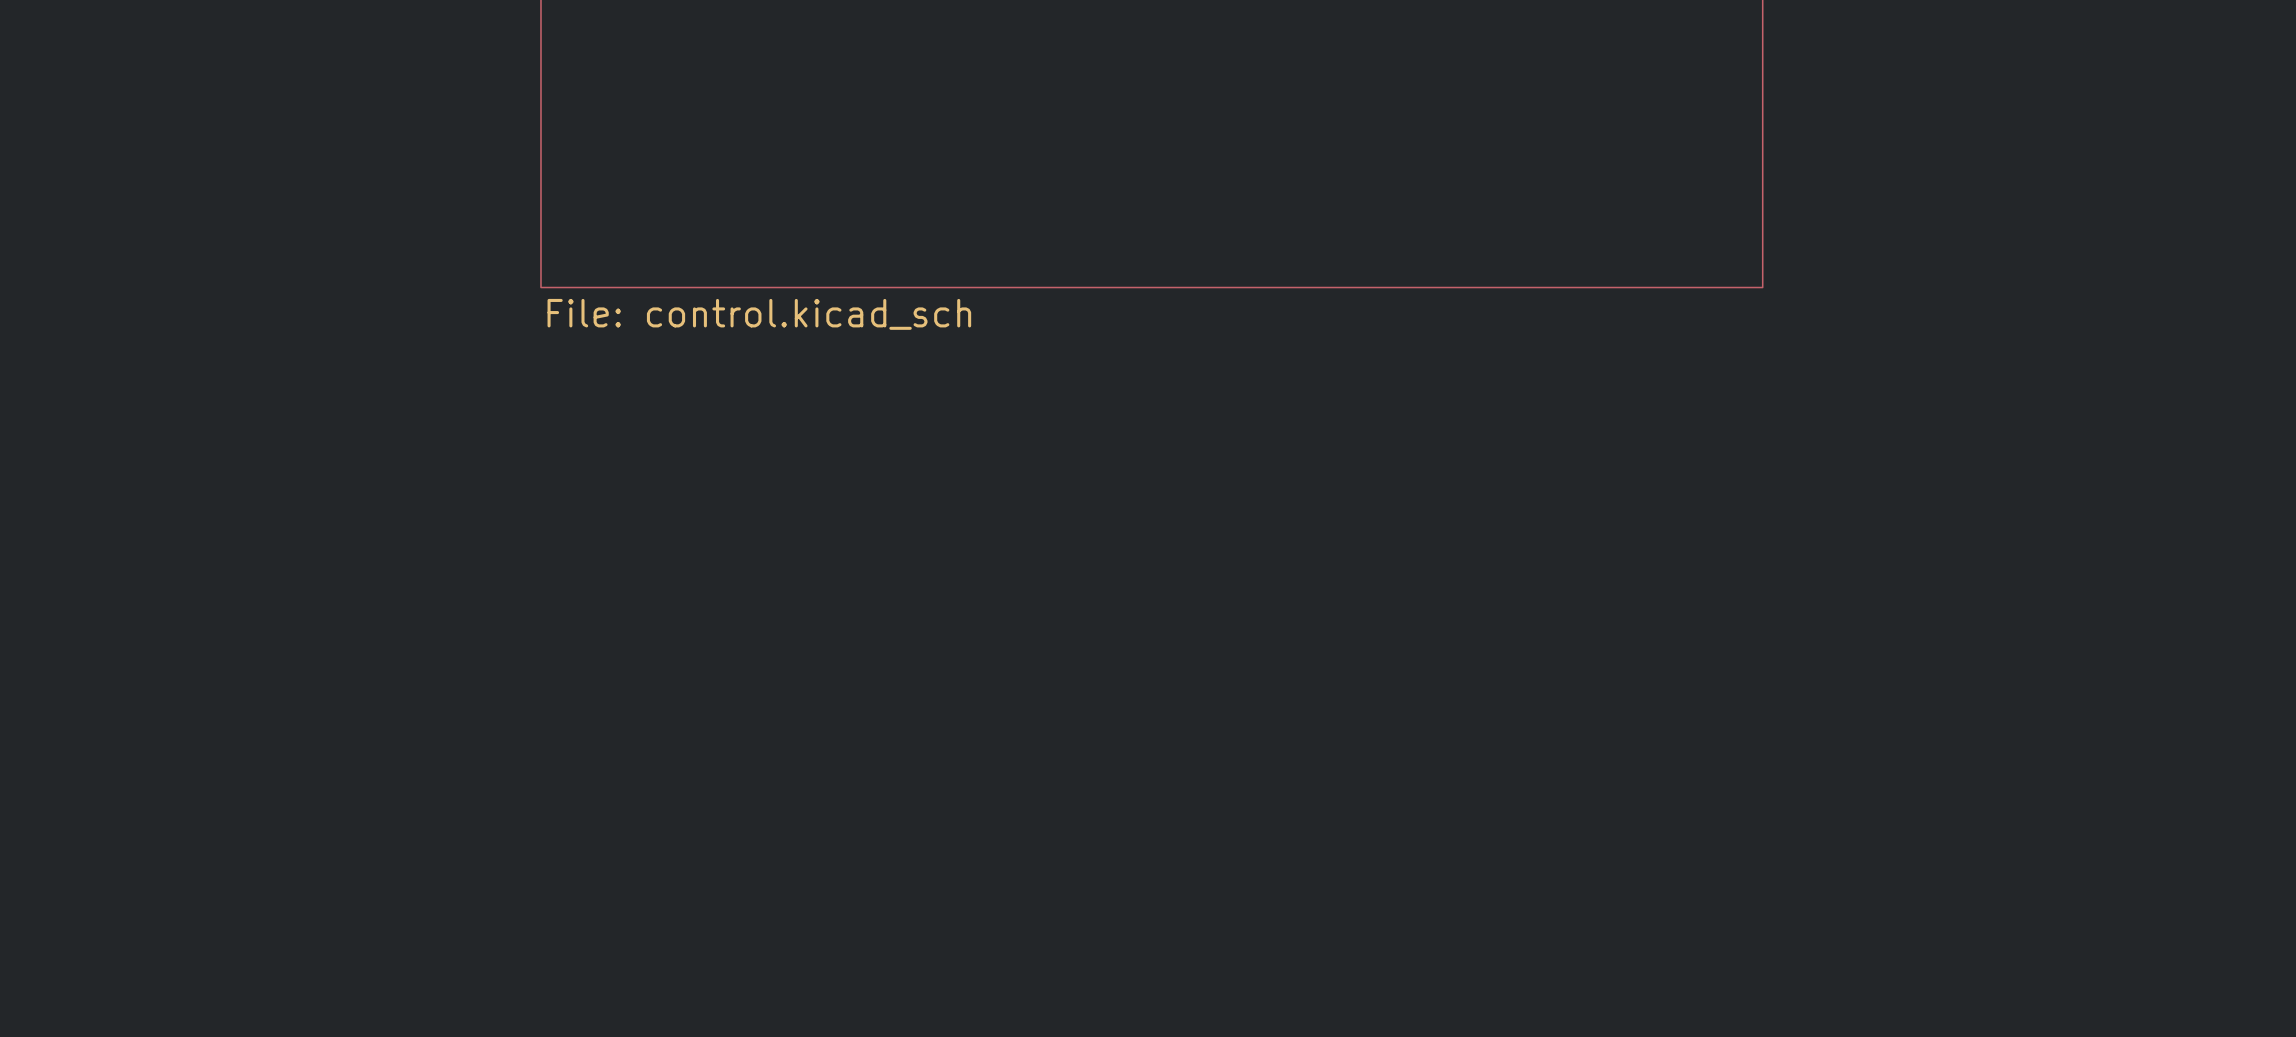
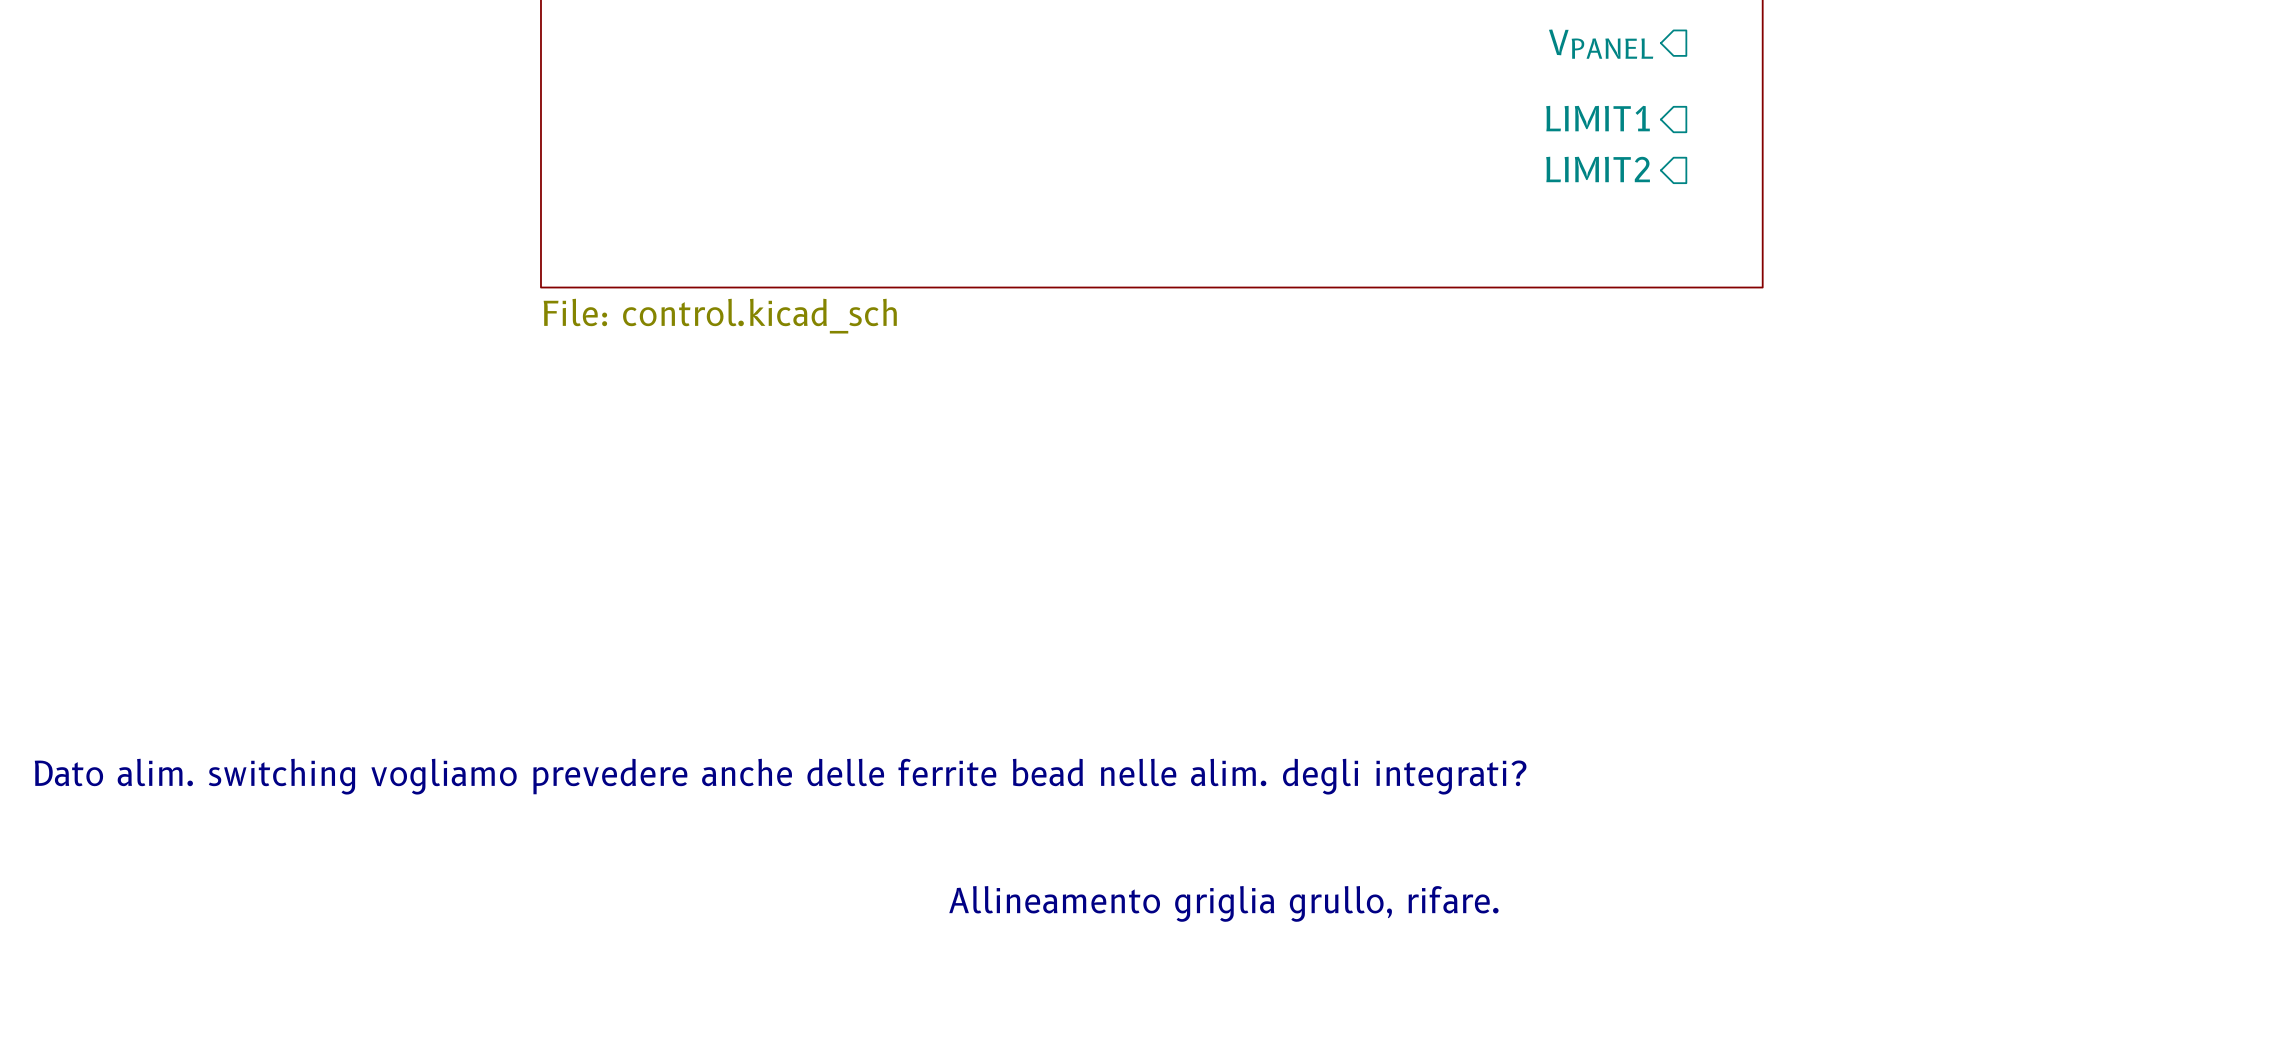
sheet pin: none -> VPANEL (1601, 44)
sheet pin: none -> LIMIT1 (1598, 118)
sheet pin: none -> LIMIT2 (1598, 169)
text: none -> Dato alim. switching vogliamo prevedere anche delle ferrite bead nelle alim. degli integrati? (780, 776)
text: none -> Allineamento griglia grullo, rifare. (1223, 903)

